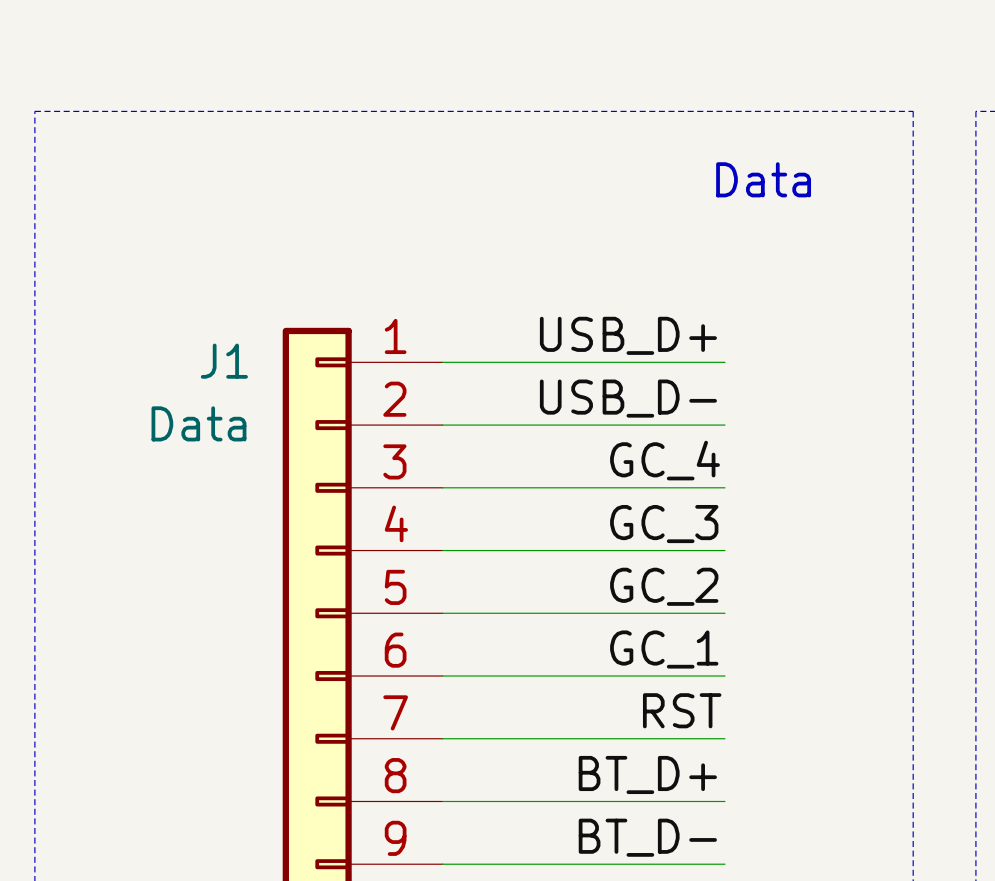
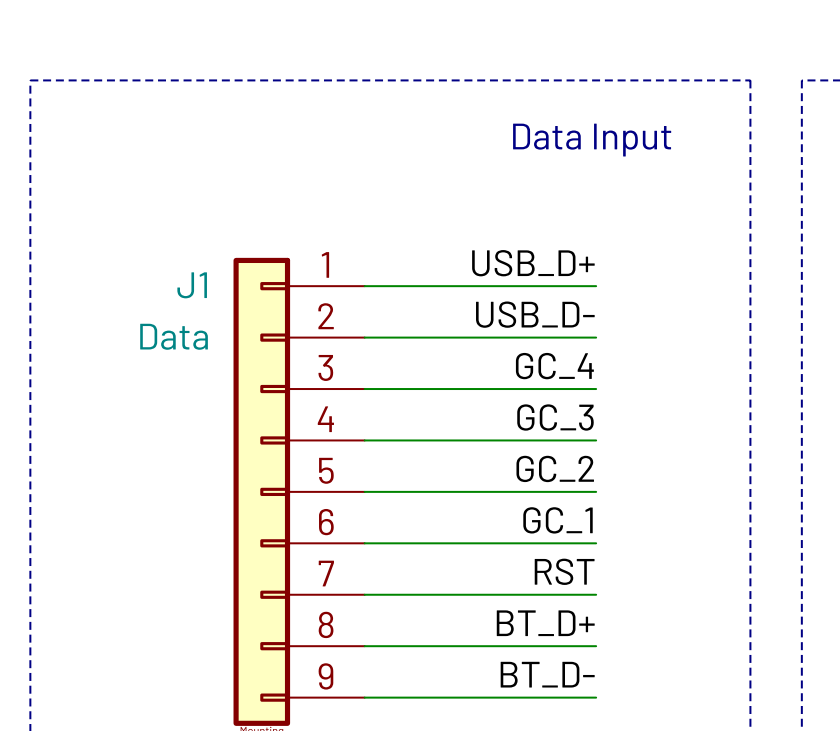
text: Data (763, 179) -> Data Input (592, 140)

